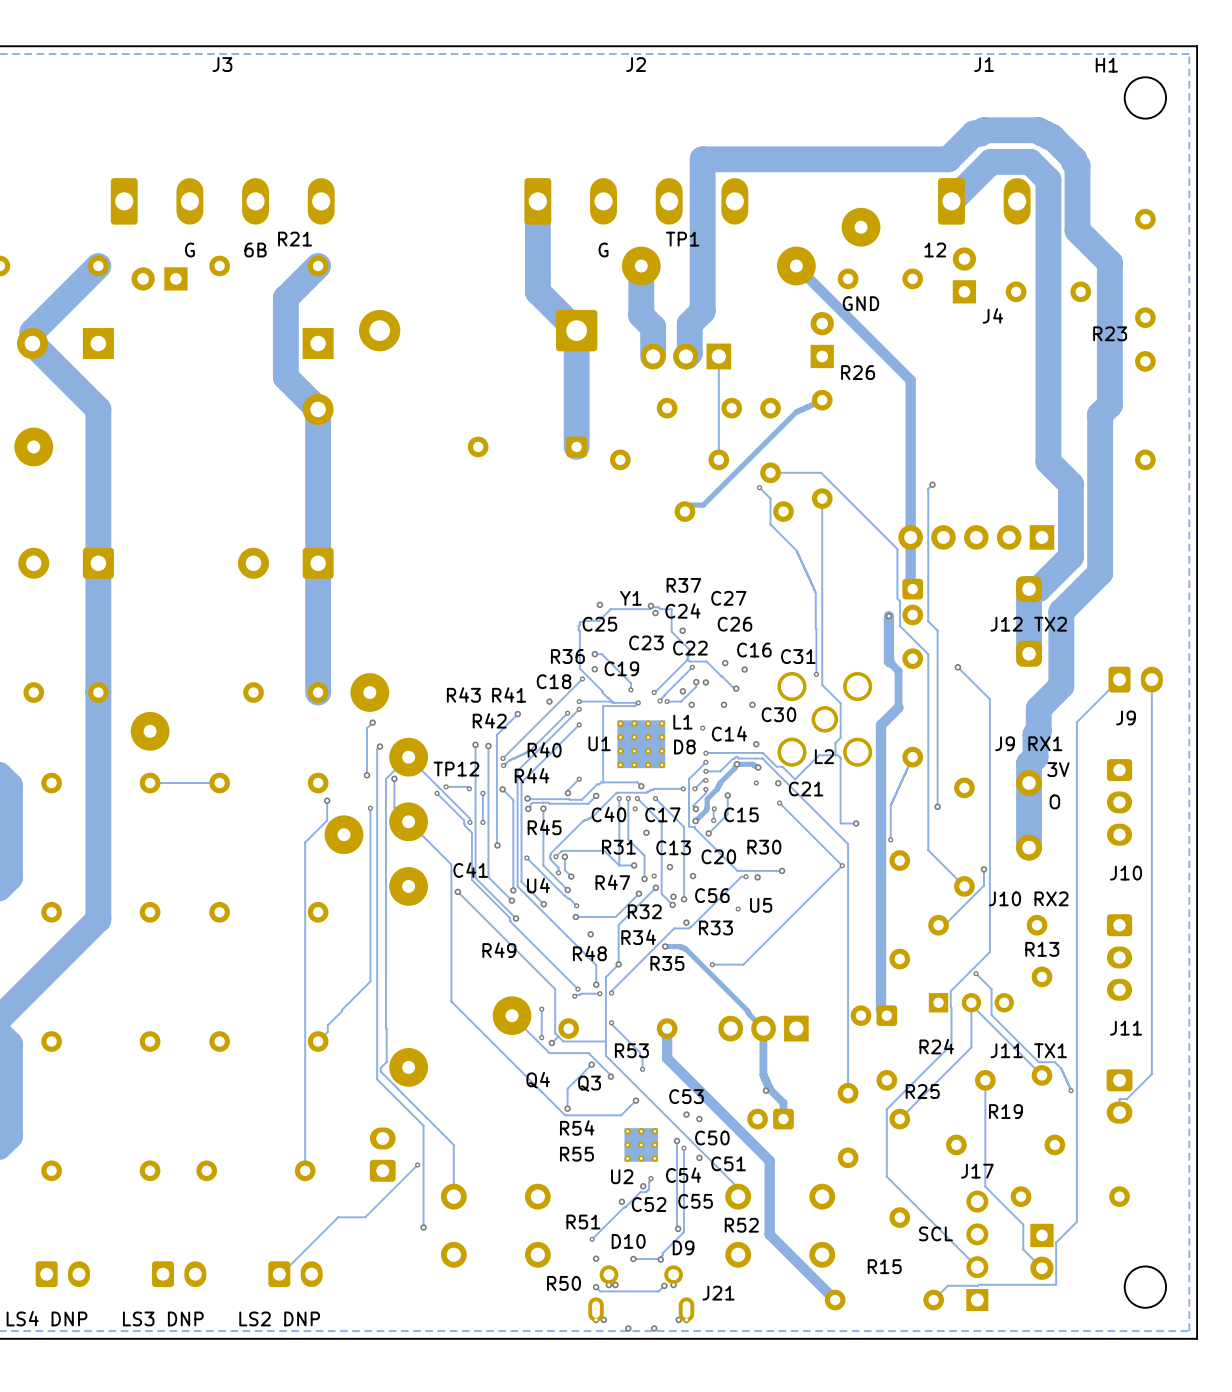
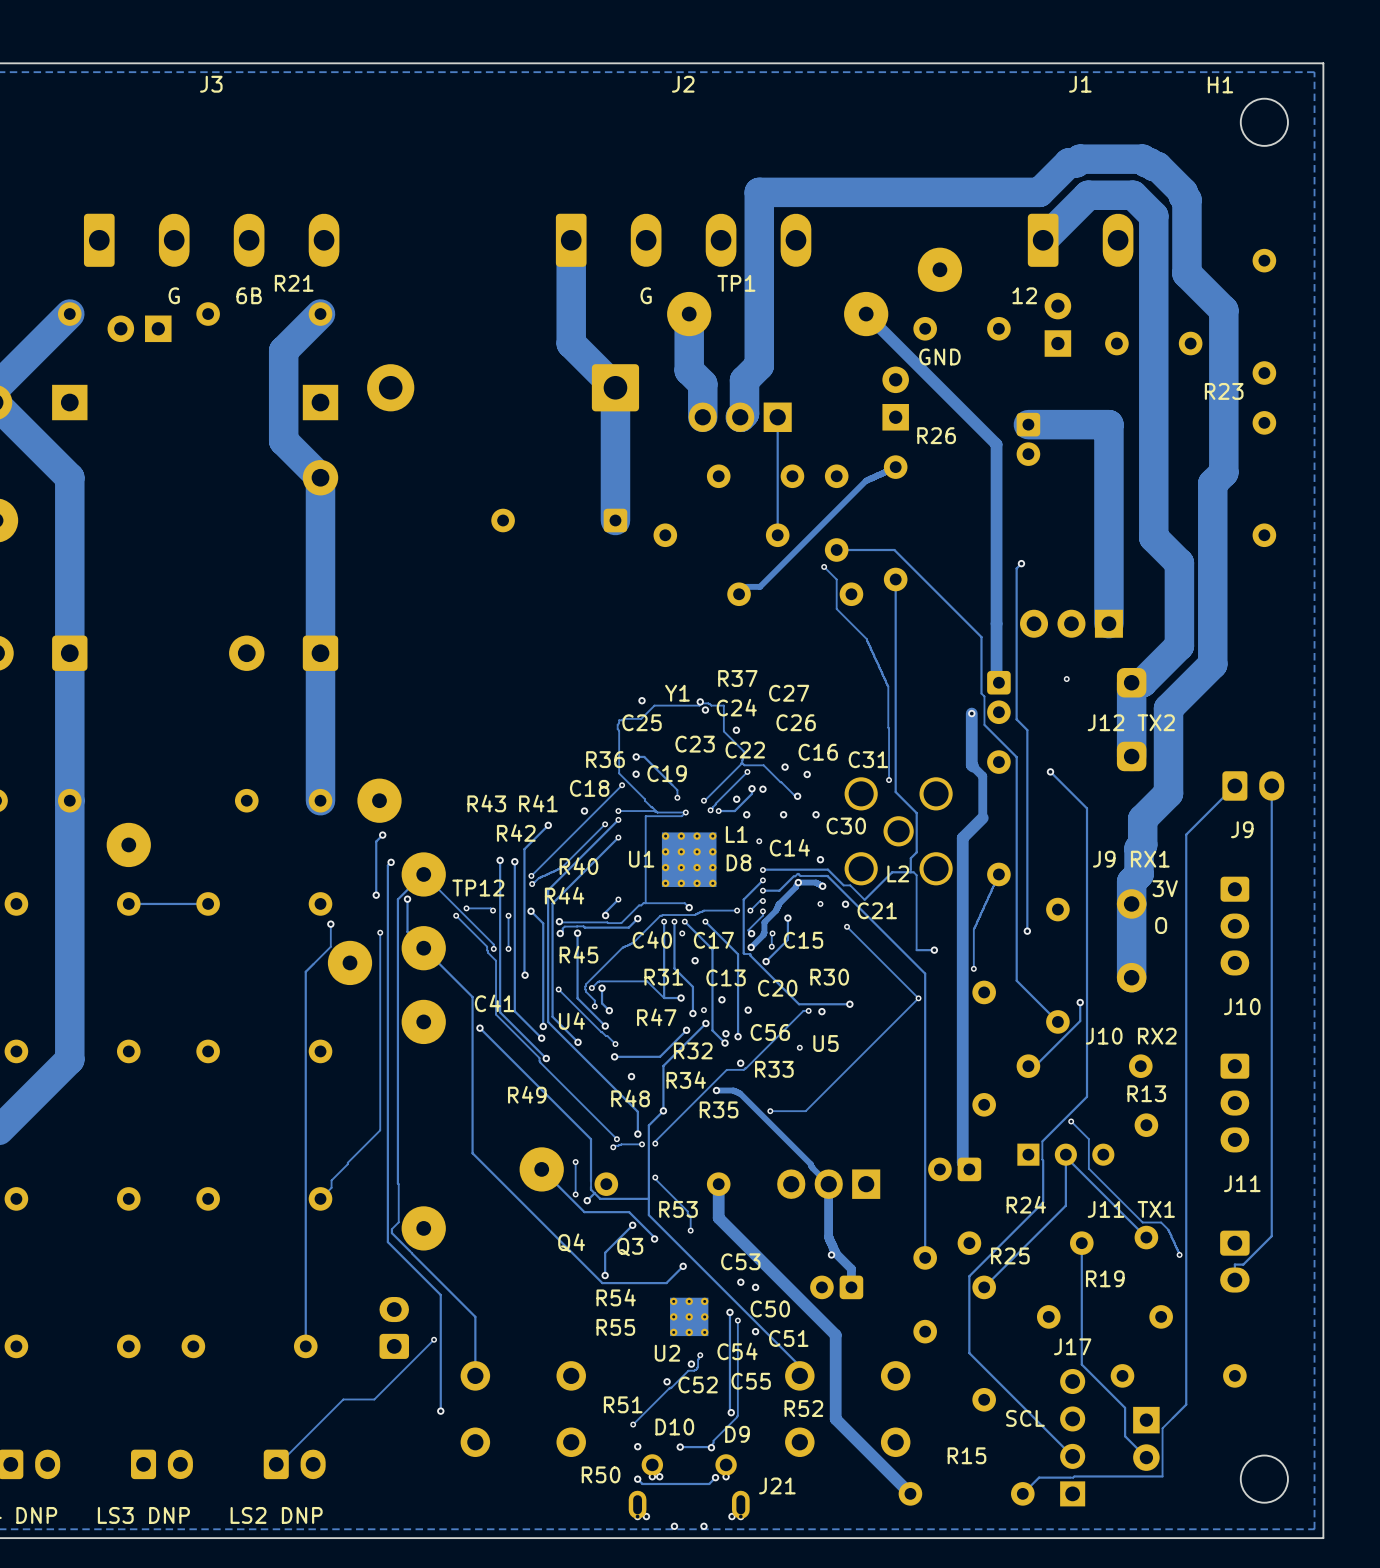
track: none -> (1028, 424) (1108, 424) (1108, 623)
part: none -> (1028, 439)
J4: (976, 537) -> none
part: none -> (1071, 623)
via: none -> (1066, 679)

